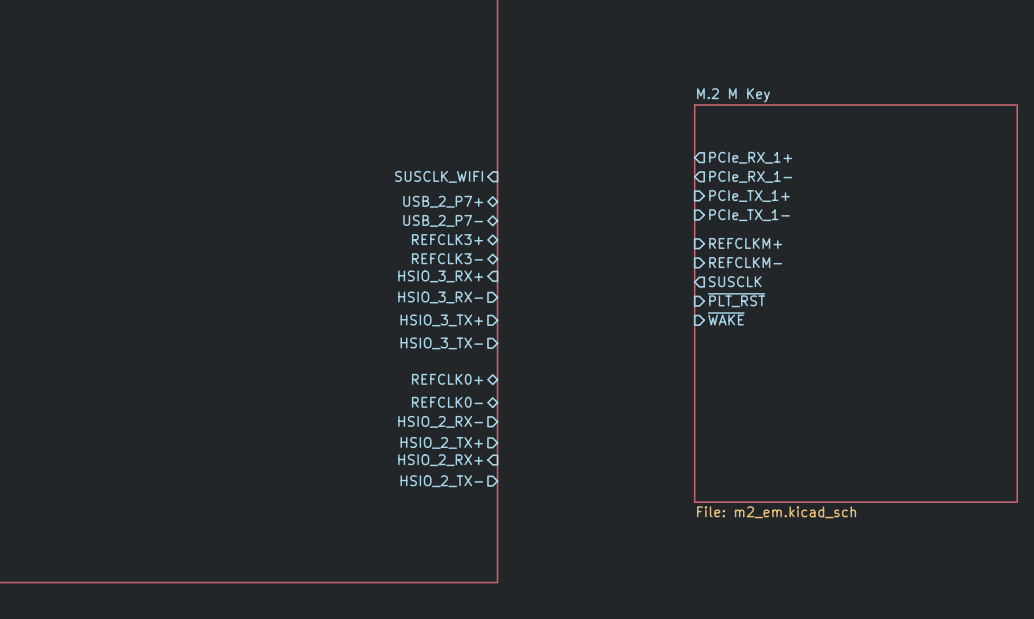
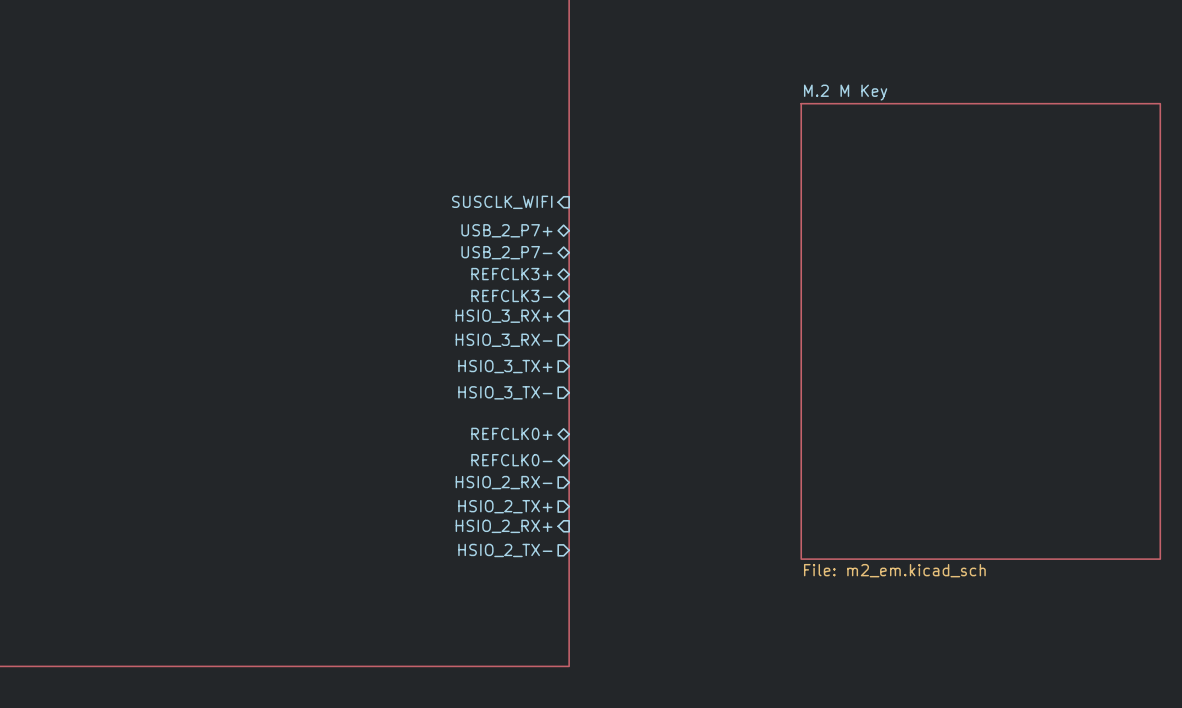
sheet M.2 M Key shape: [694, 104, 1018, 503] -> [800, 103, 1161, 560]
sheet pin: PCIe_RX_1+ (750, 157) -> none
sheet pin: PCIe_RX_1- (750, 176) -> none
sheet pin: PCIe_TX_1+ (749, 196) -> none
sheet pin: PCIe_TX_1- (749, 215) -> none
sheet pin: REFCLKM+ (745, 243) -> none
sheet pin: REFCLKM- (745, 262) -> none
sheet pin: SUSCLK (735, 281) -> none
sheet pin: ~{PLT_RST} (736, 300) -> none
sheet pin: ~{WAKE} (726, 318) -> none

